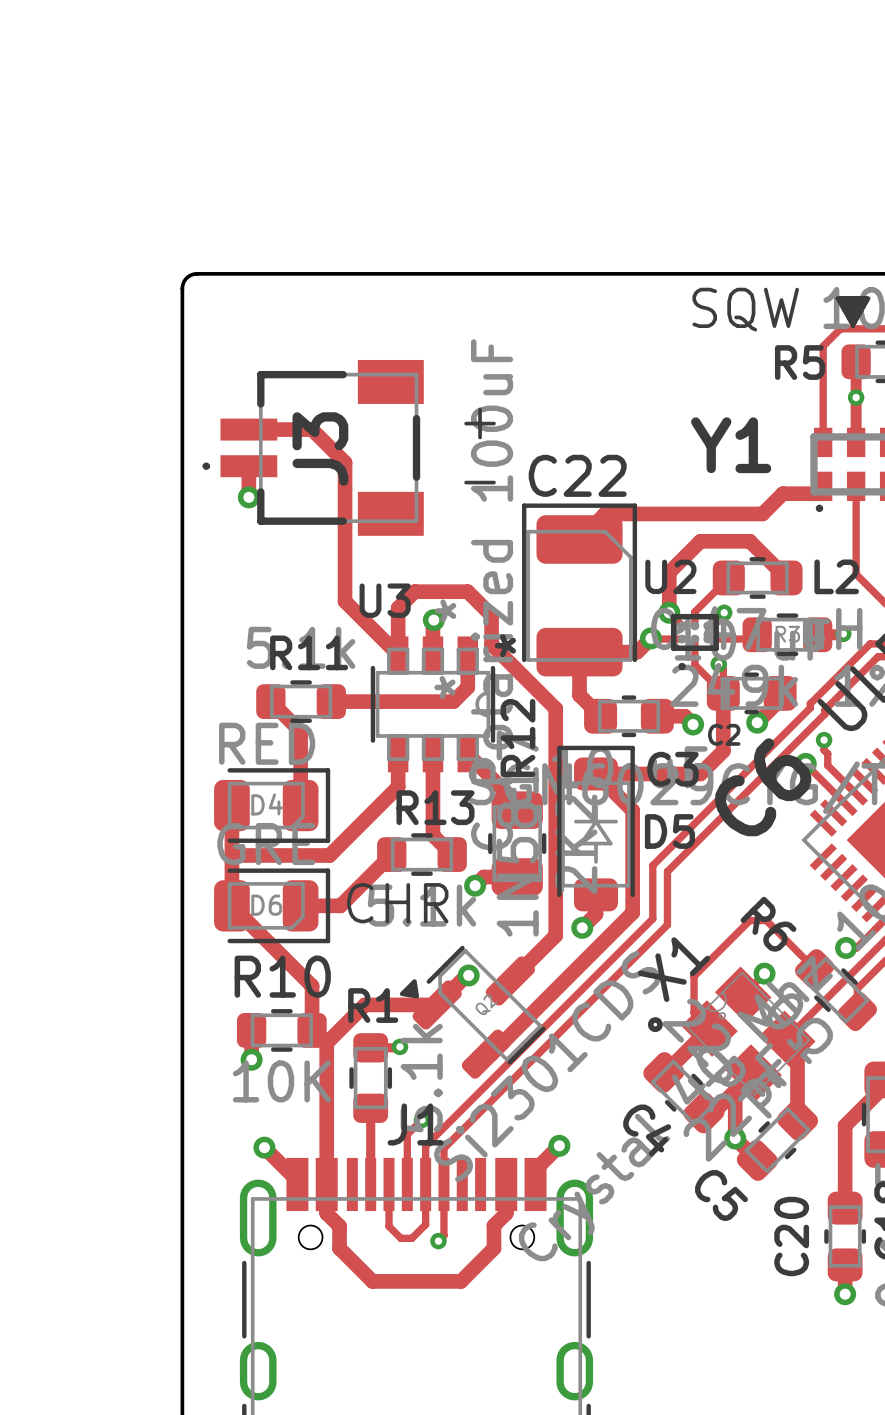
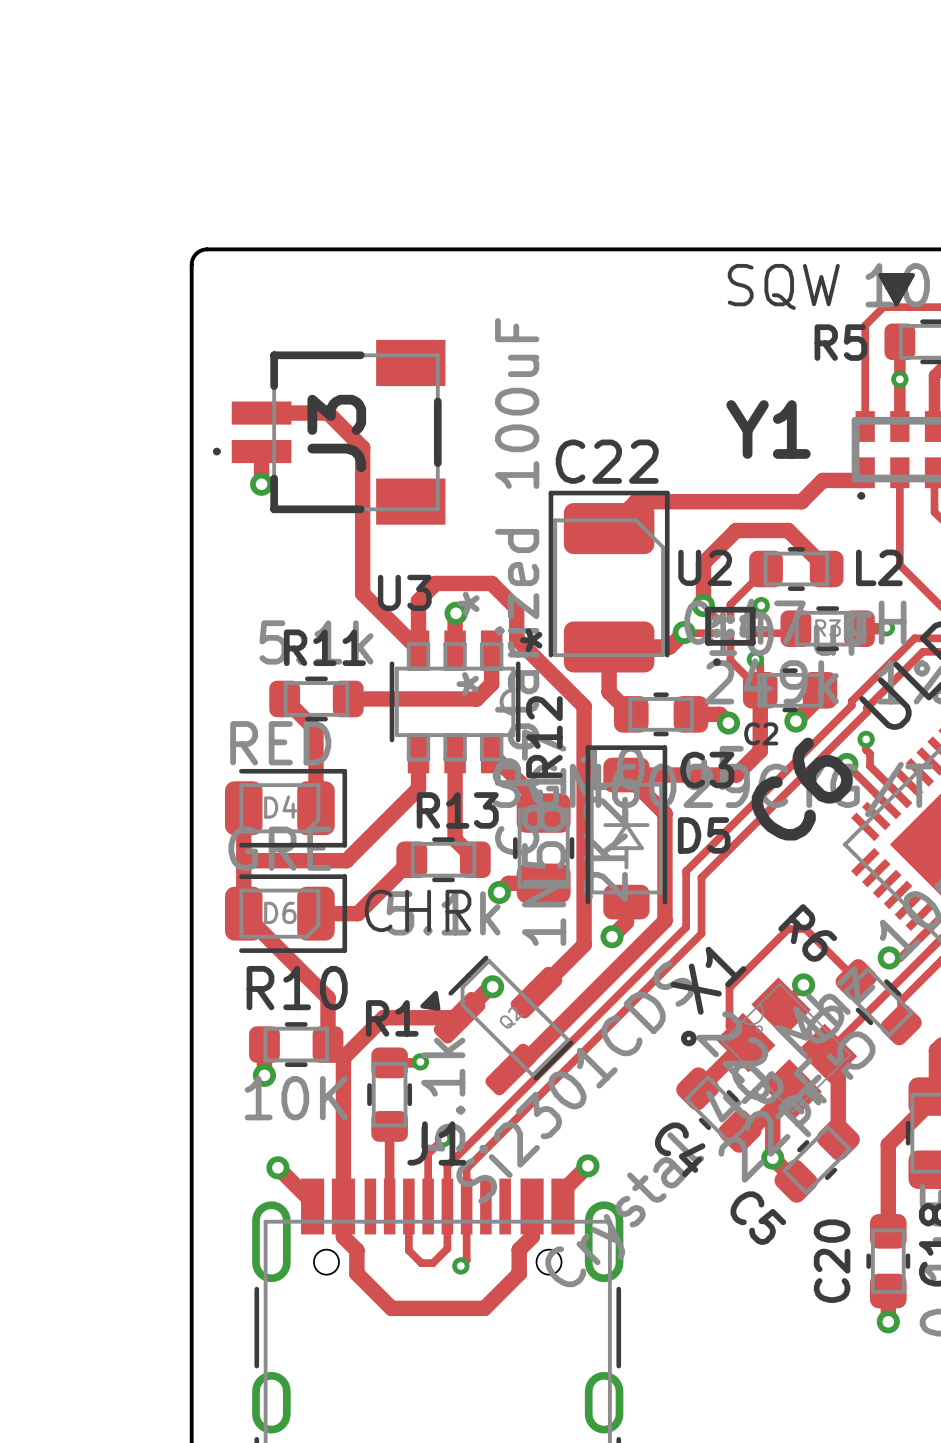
text: + (480, 423) -> none
text: - (480, 482) -> none

